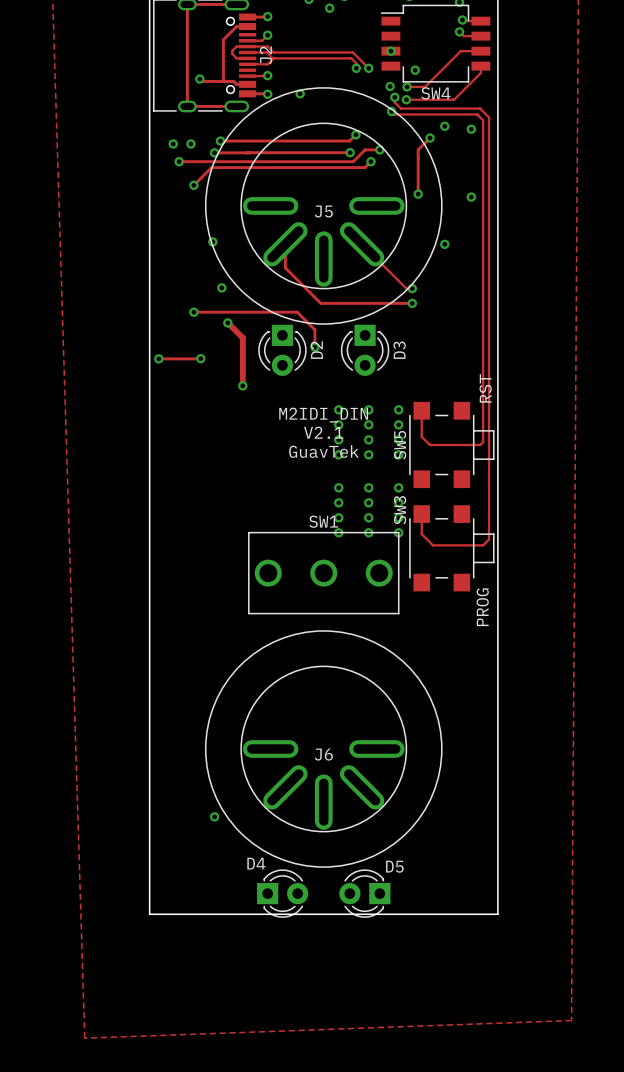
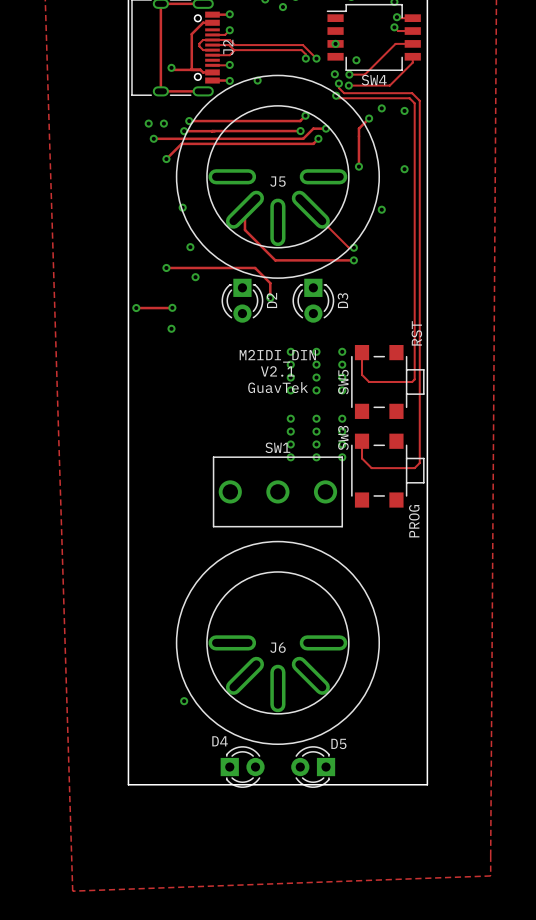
track: (227, 322) (242, 337) (242, 385) -> none
via position: (242, 385) -> (171, 328)

